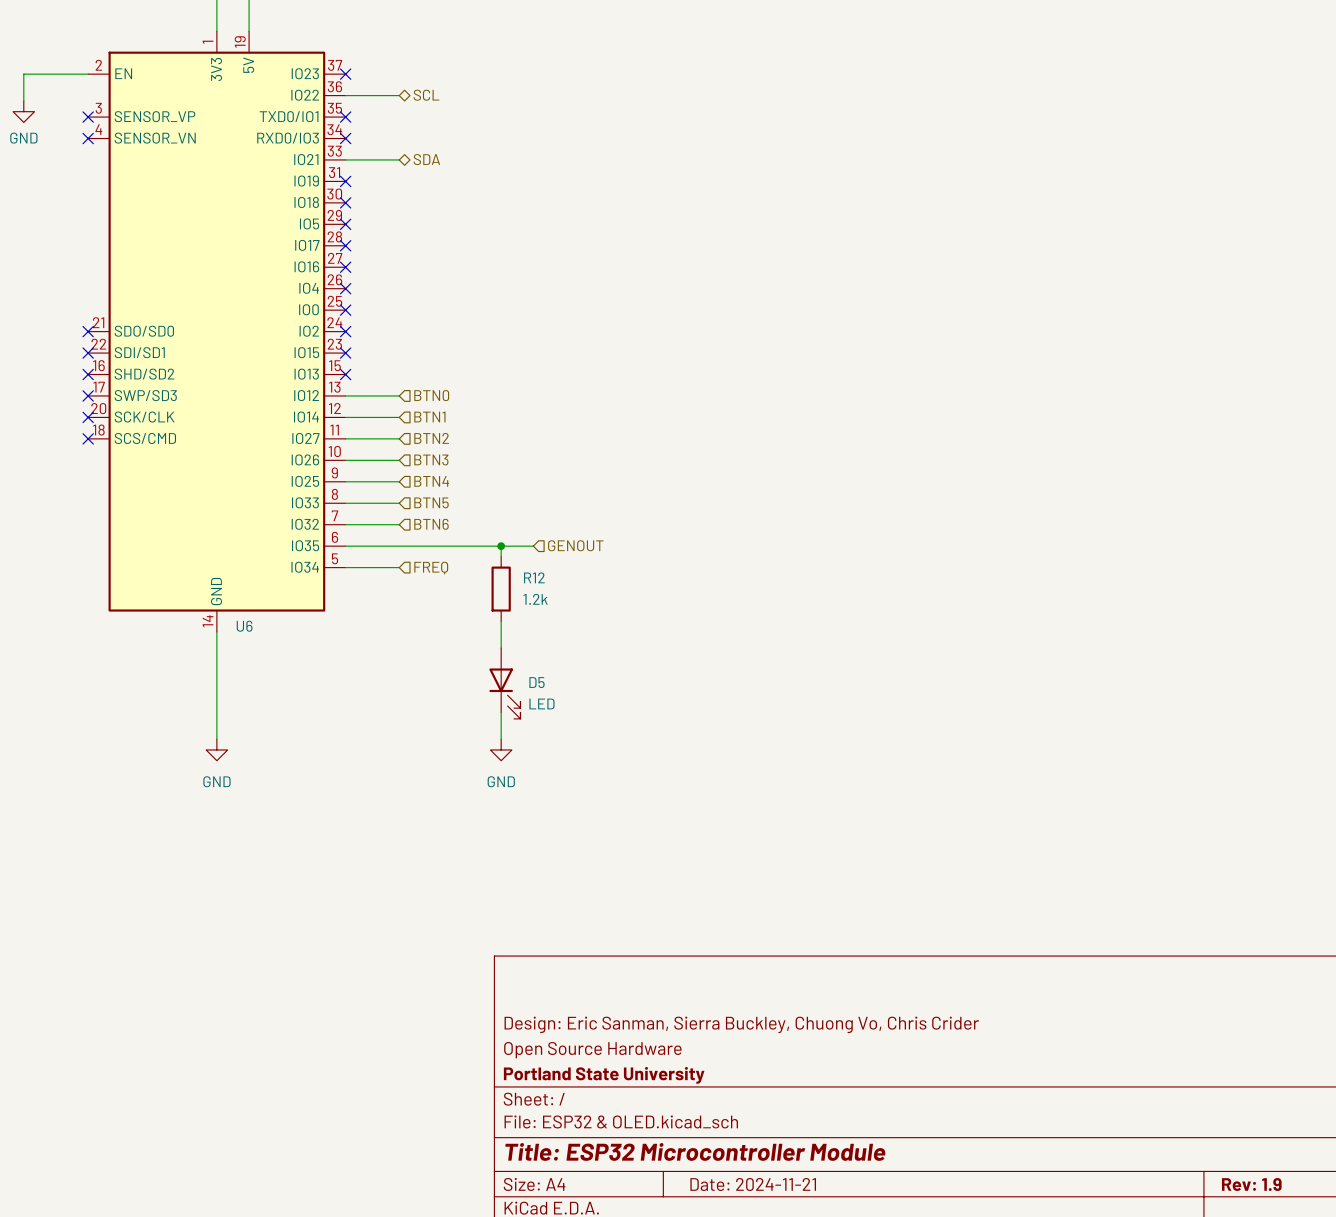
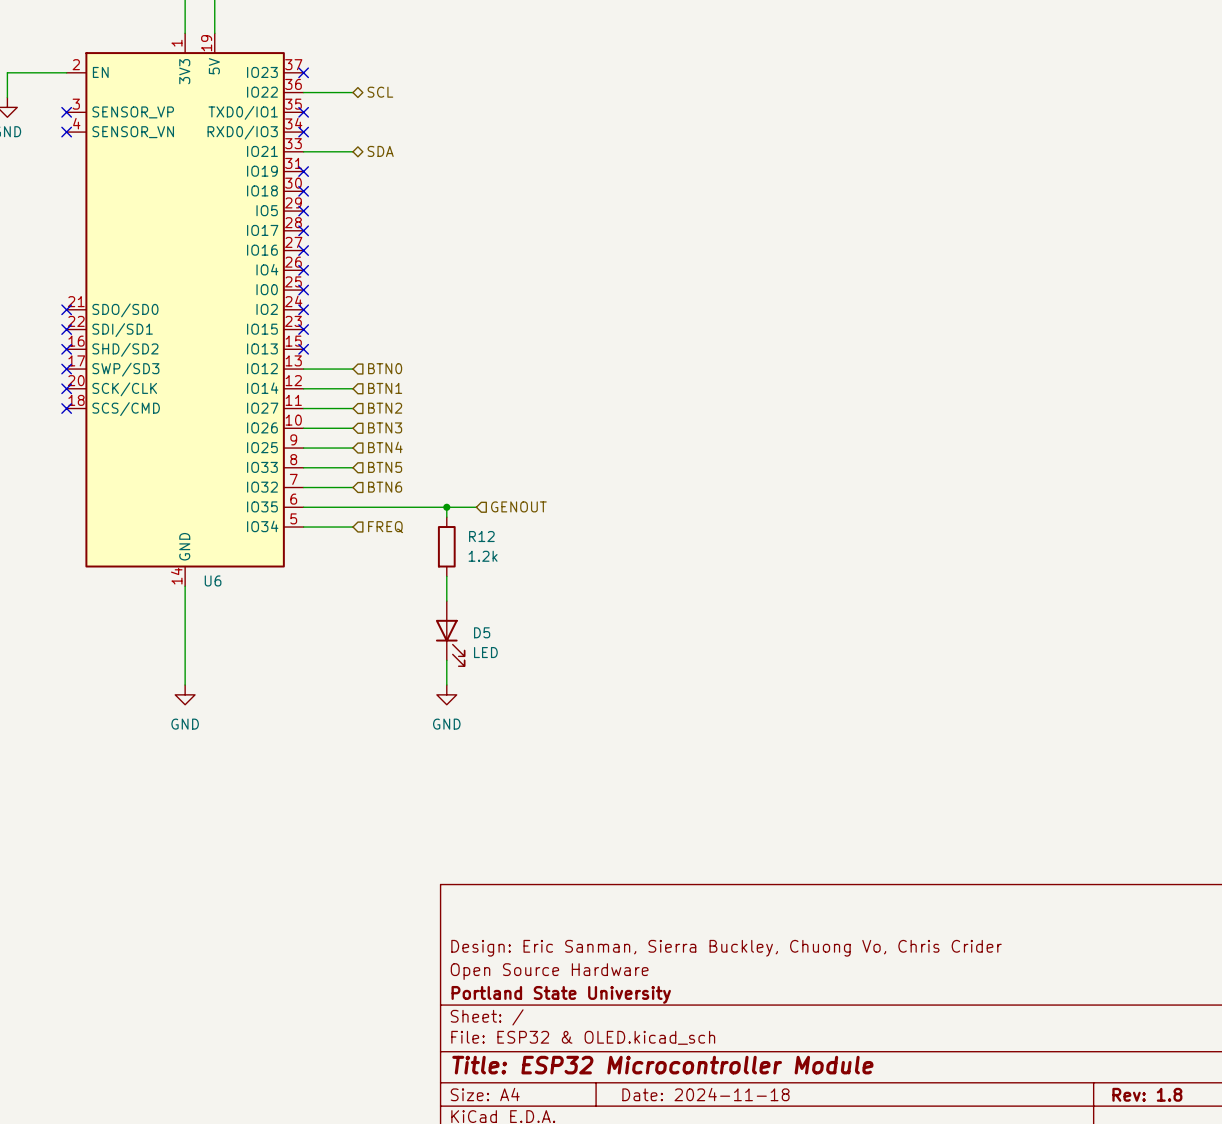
title block: Date: 2024-11-21 (753, 1184) -> Date: 2024-11-18 (705, 1094)
title block: Rev: 1.9 (1251, 1184) -> Rev: 1.8 (1147, 1094)

